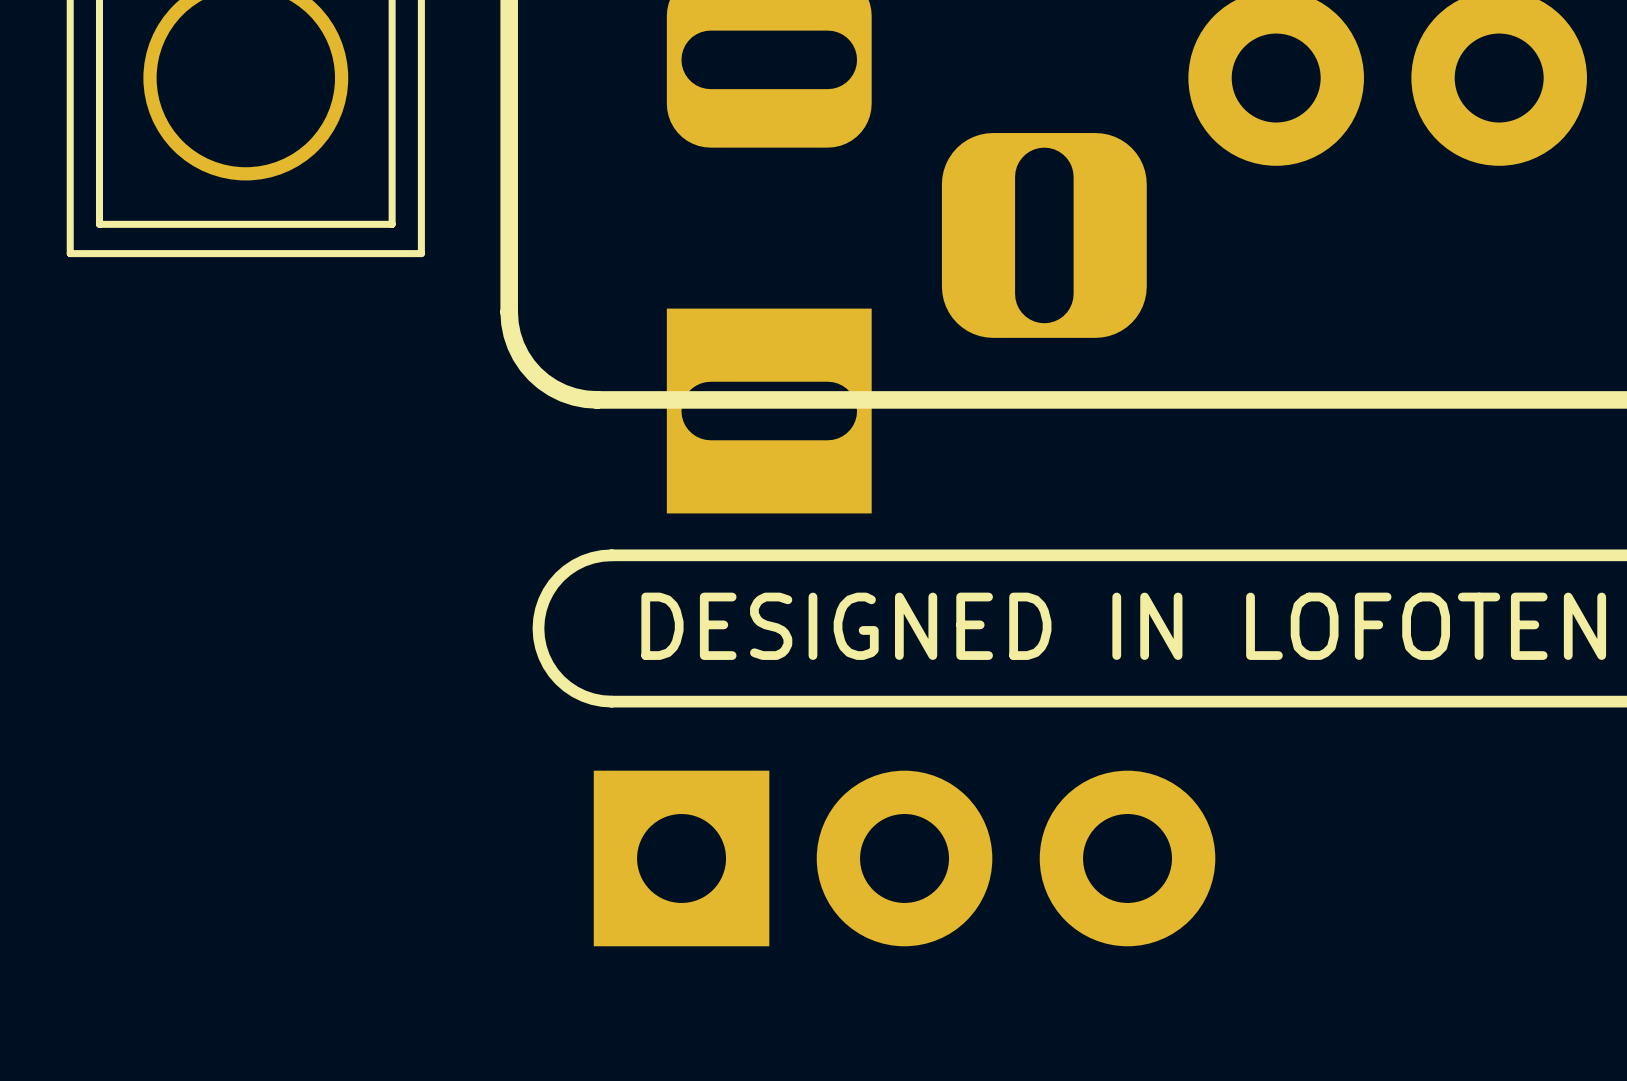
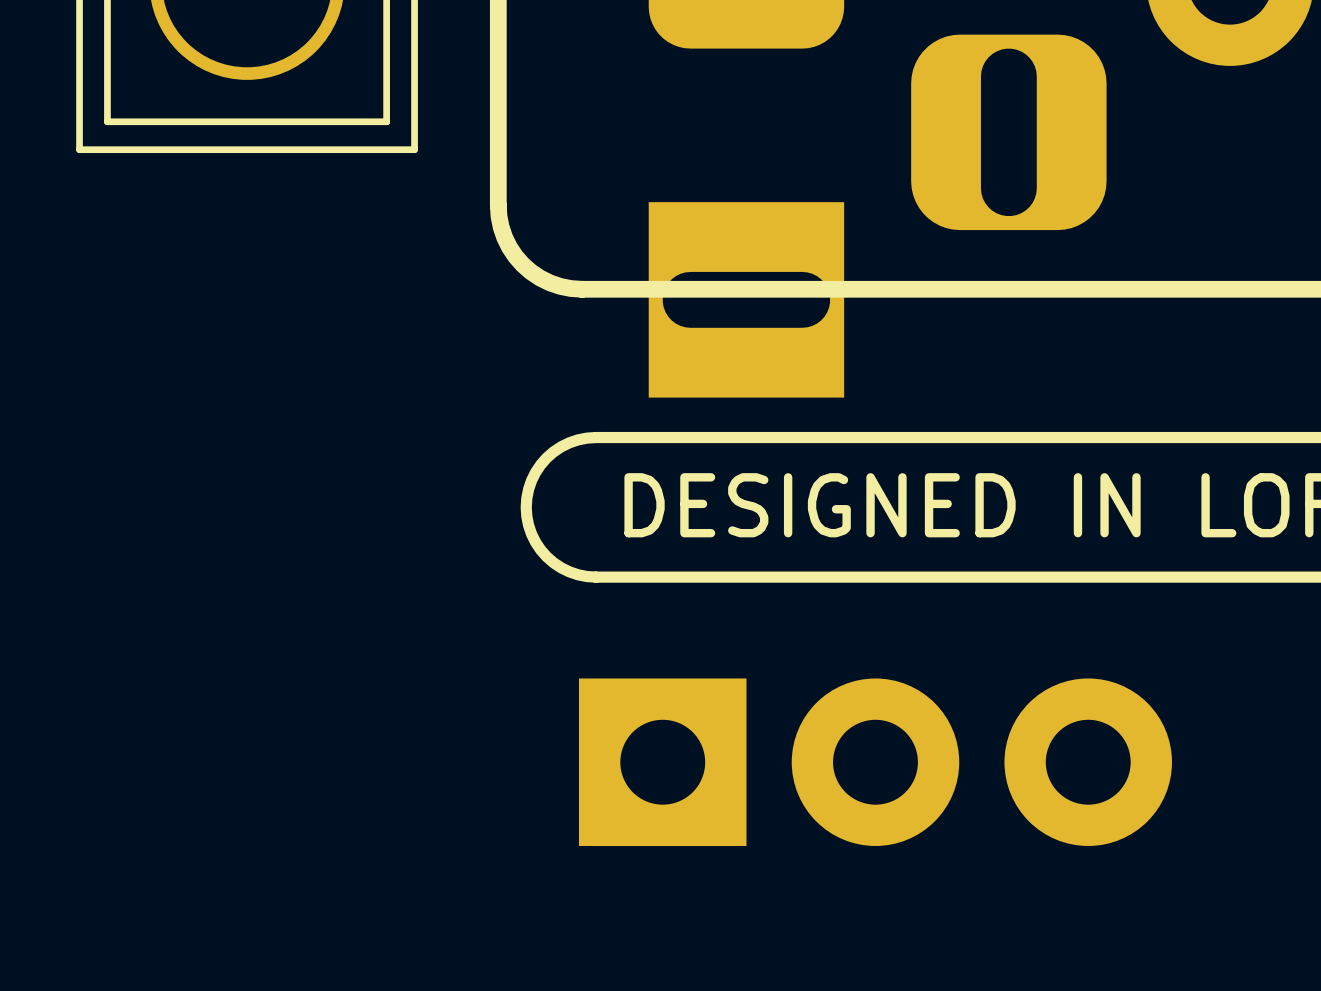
part position: (904, 858) -> (875, 762)

